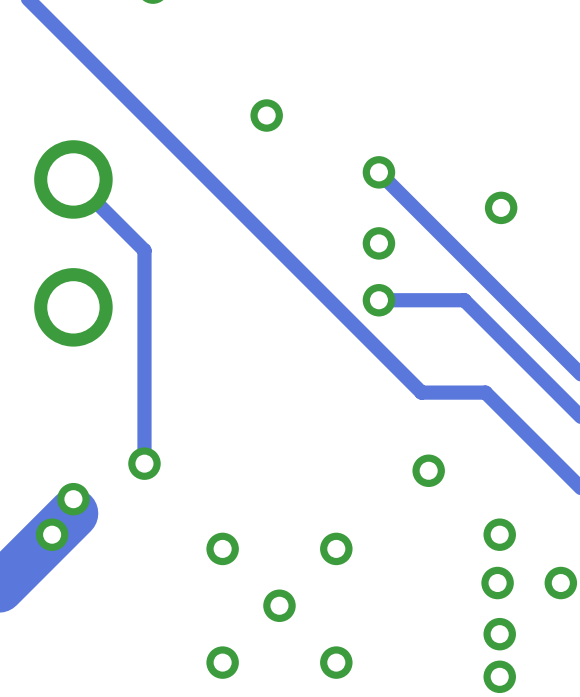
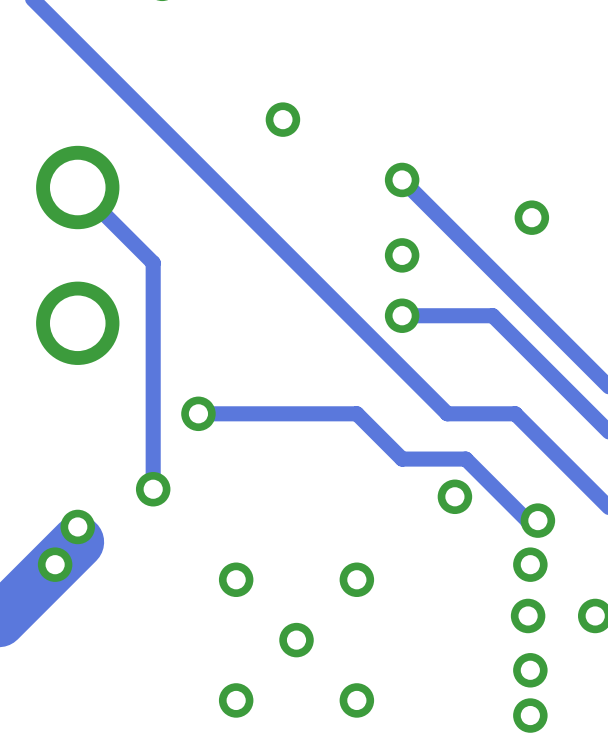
track: none -> (198, 413) (356, 413) (402, 459) (465, 459) (527, 520) (537, 520)
via: none -> (198, 413)
via: none -> (537, 520)

